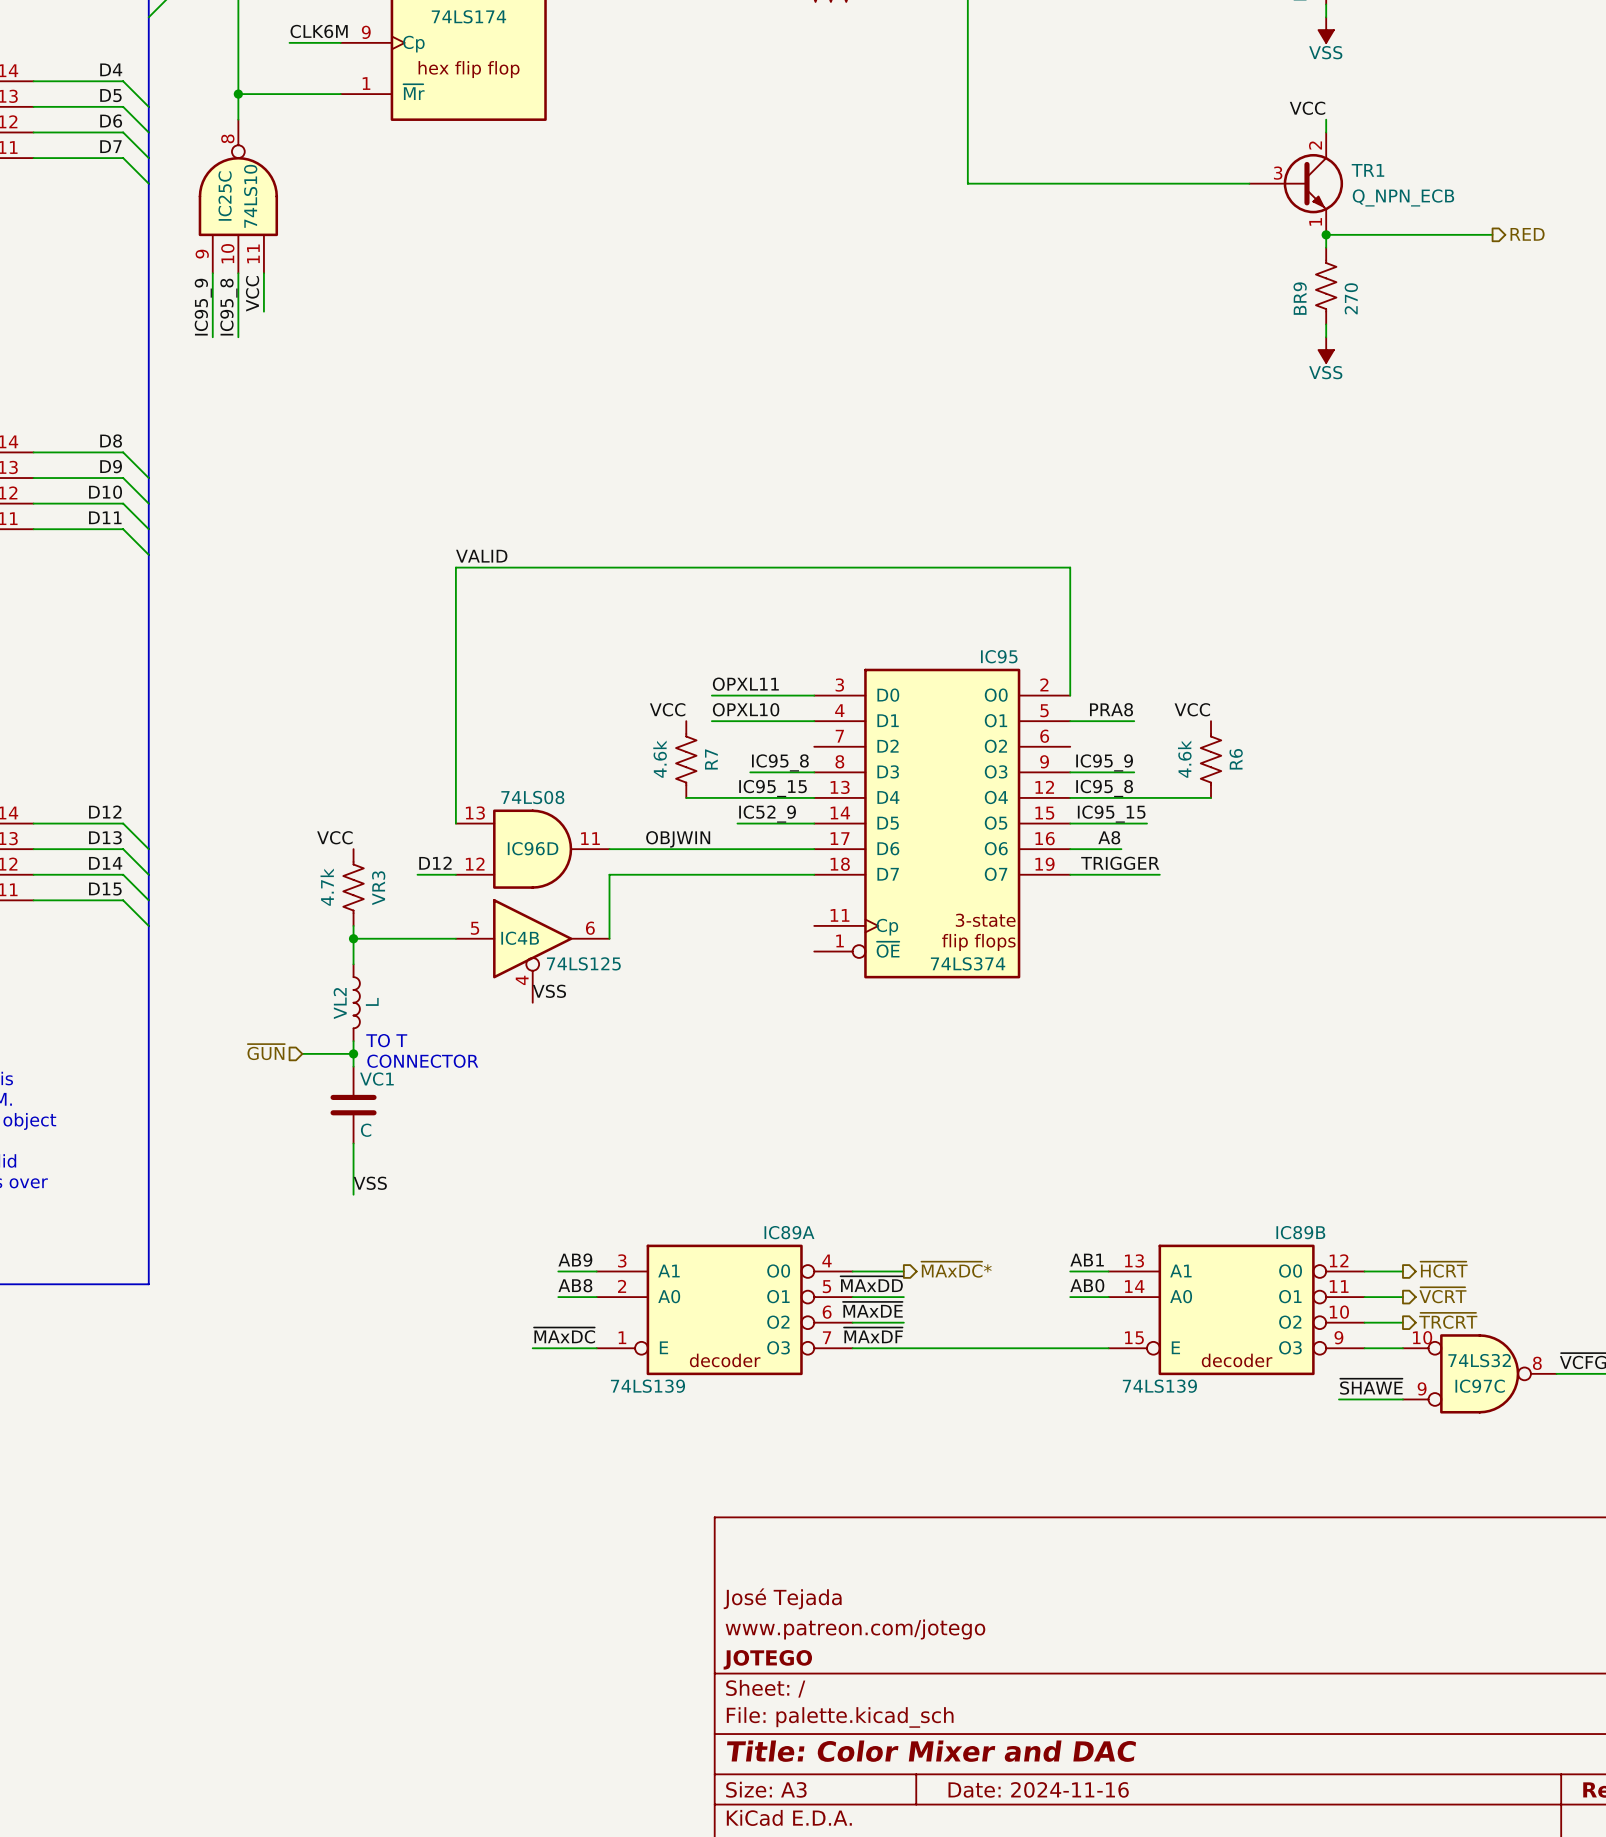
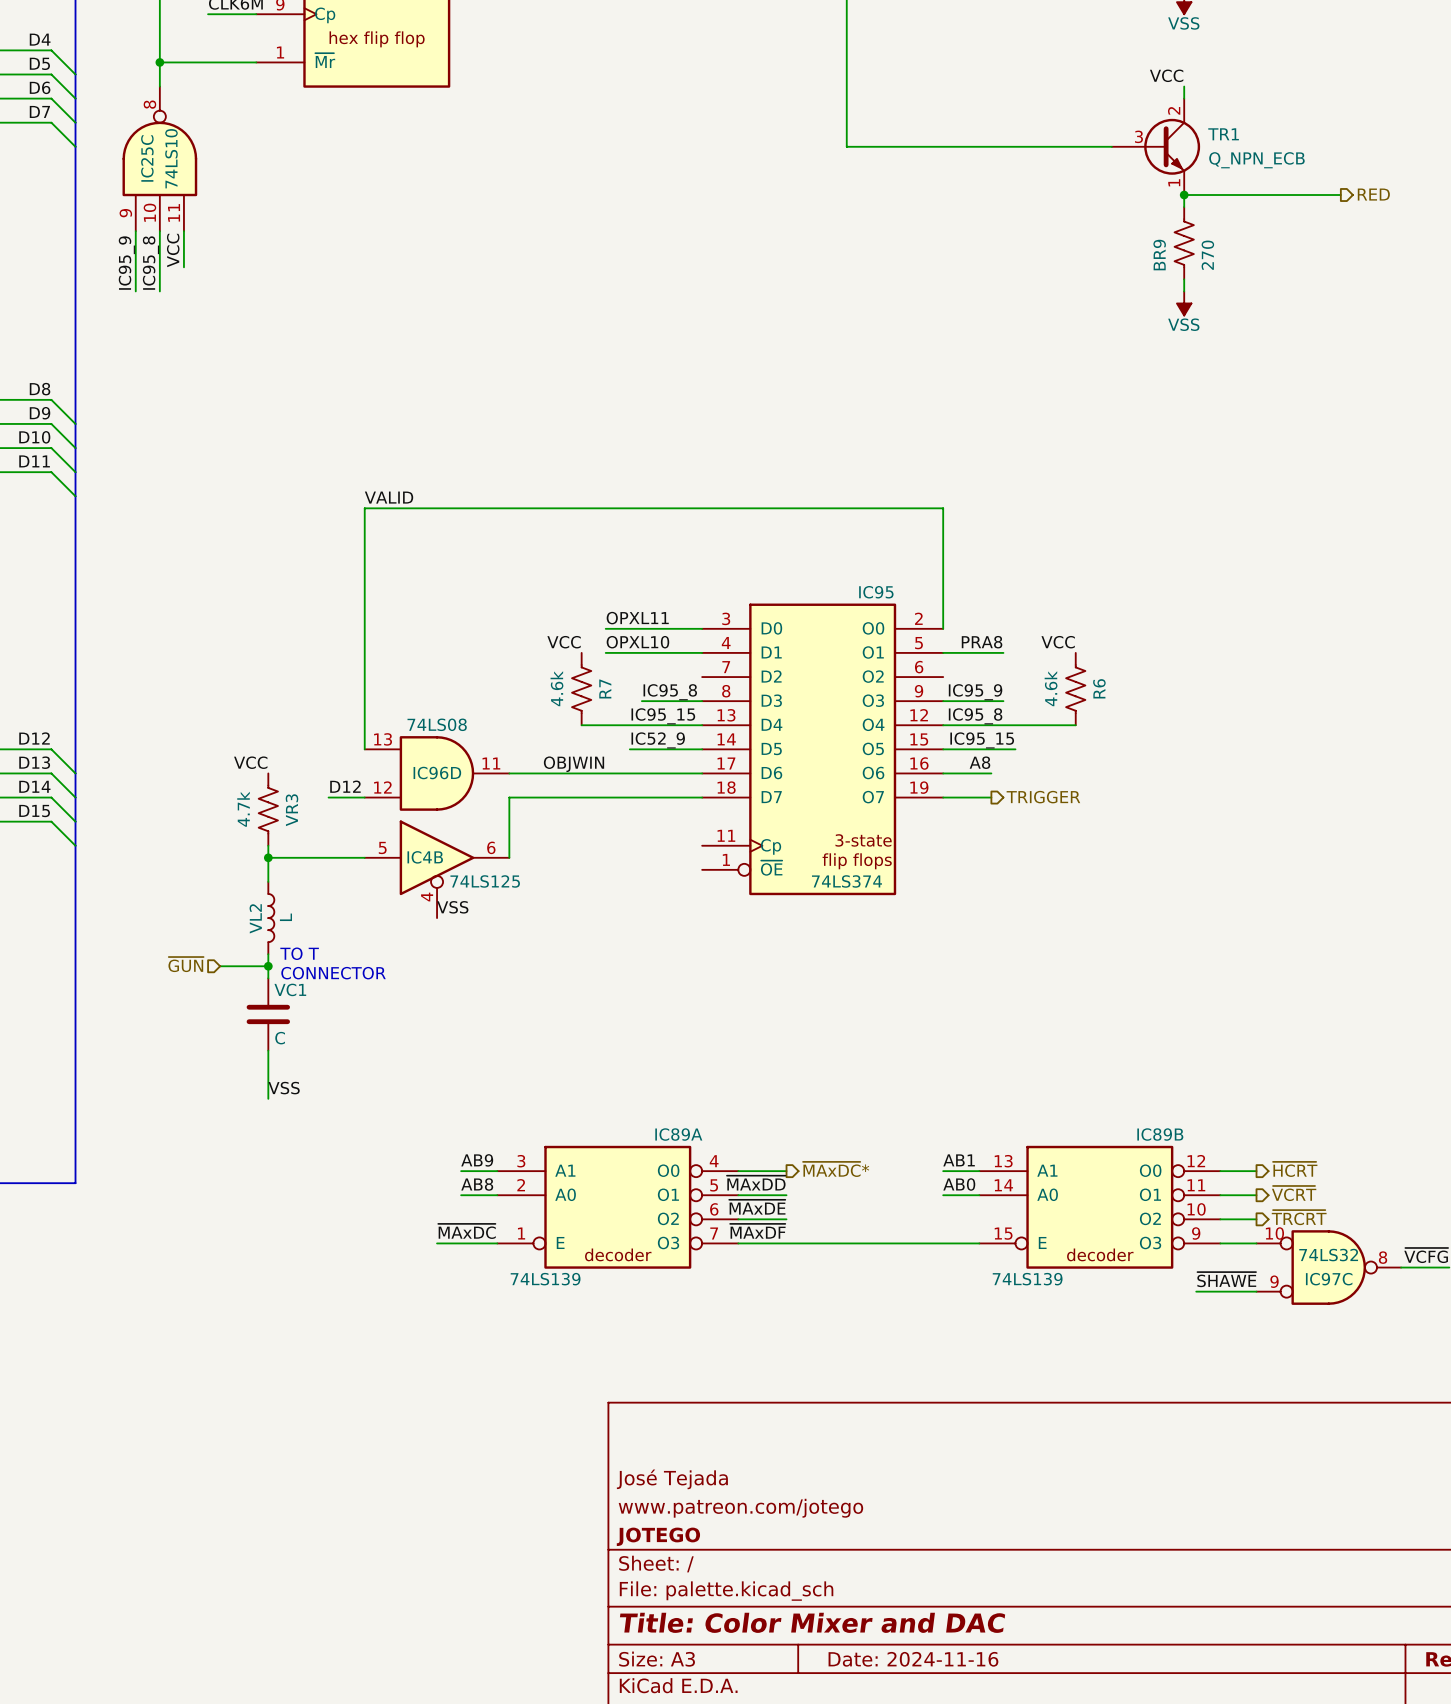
label: TRIGGER (1120, 863) -> none
wire: (1121, 874) (1159, 874) -> none
hierarchical label: none -> TRIGGER (1043, 797)

